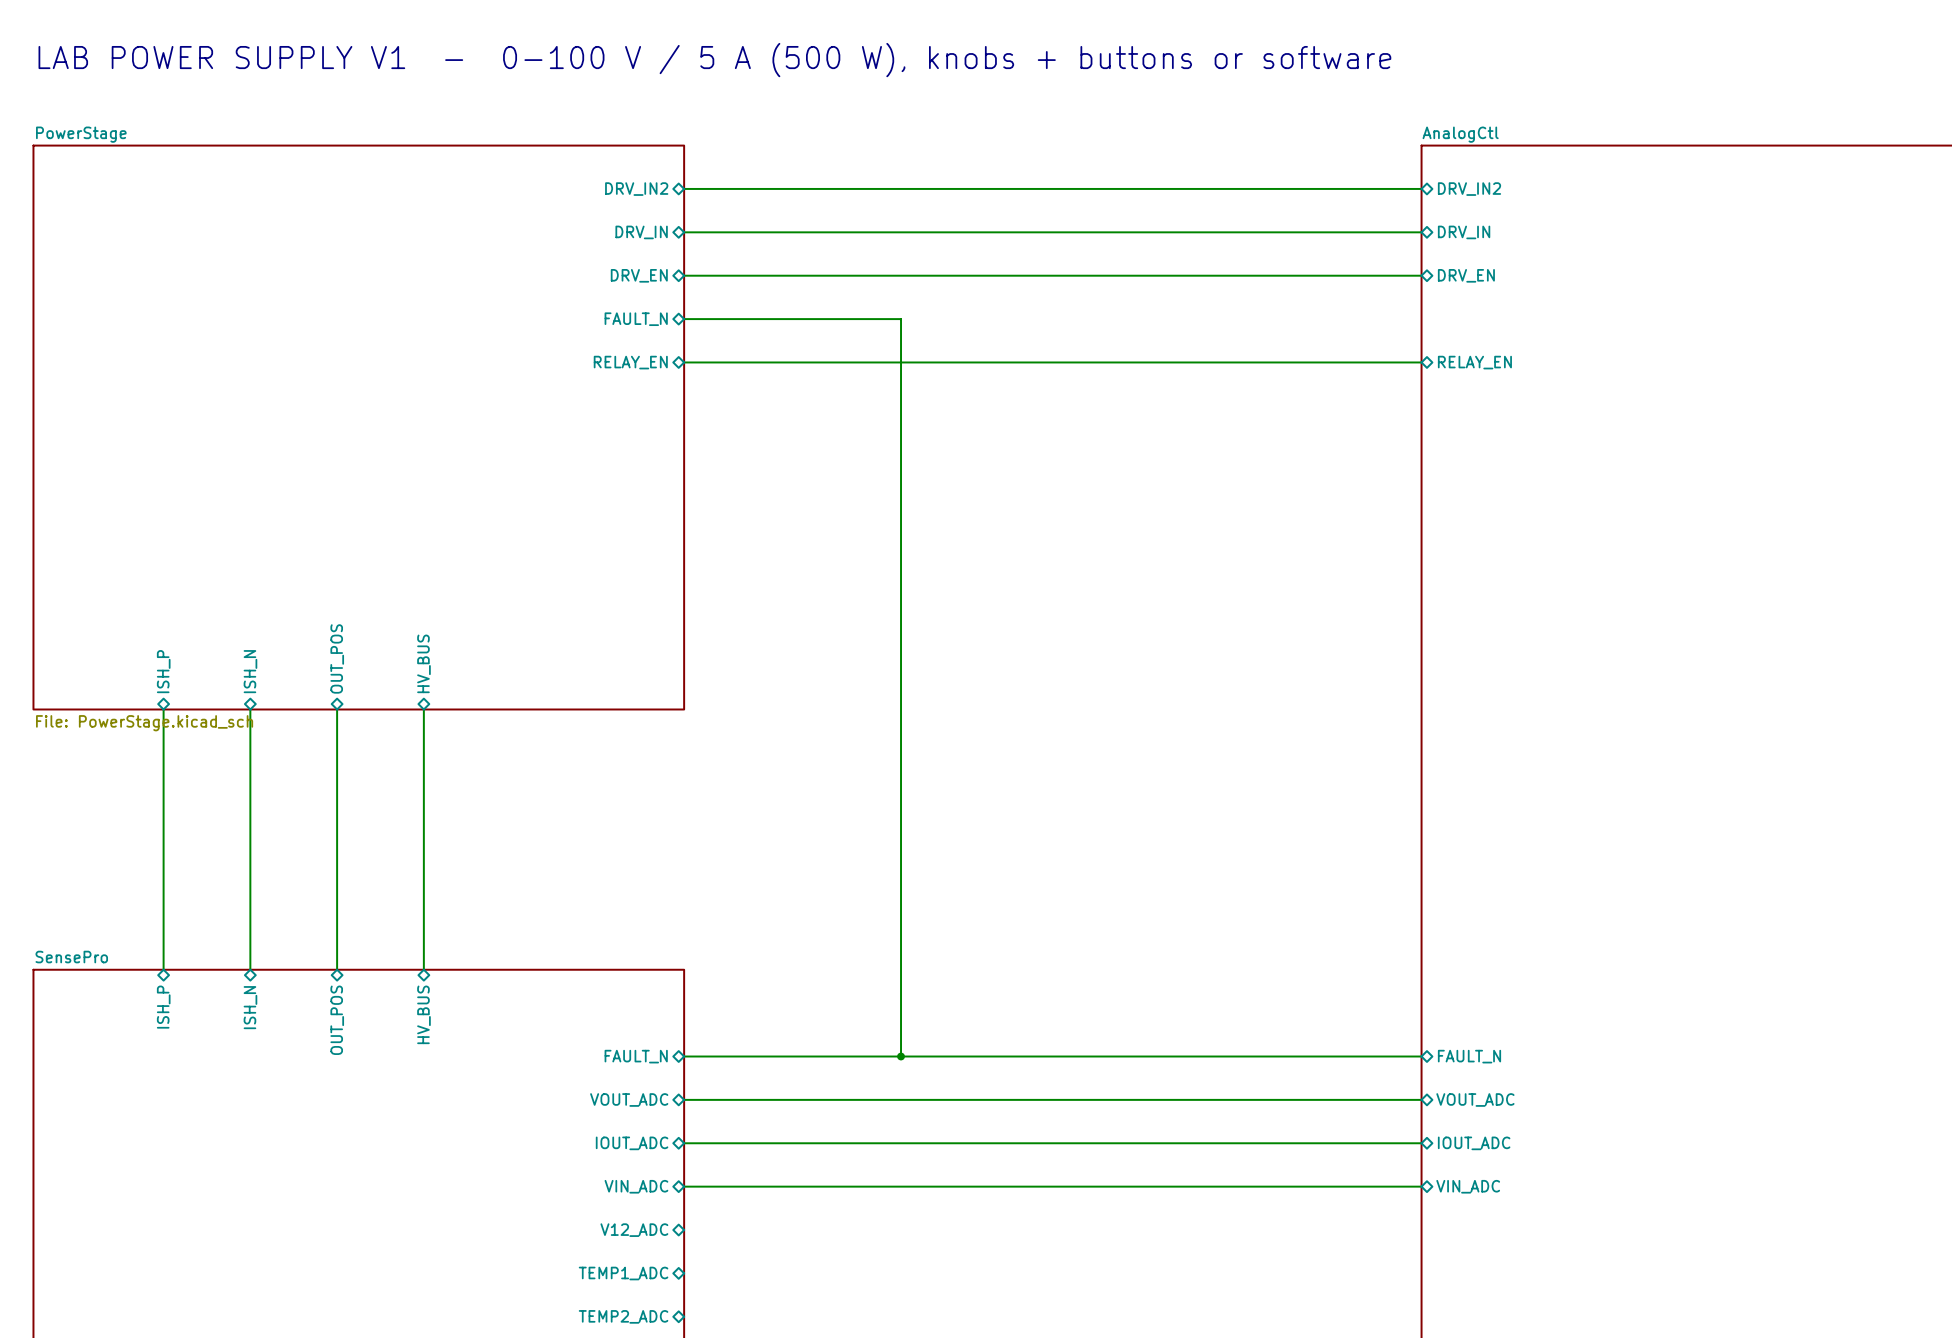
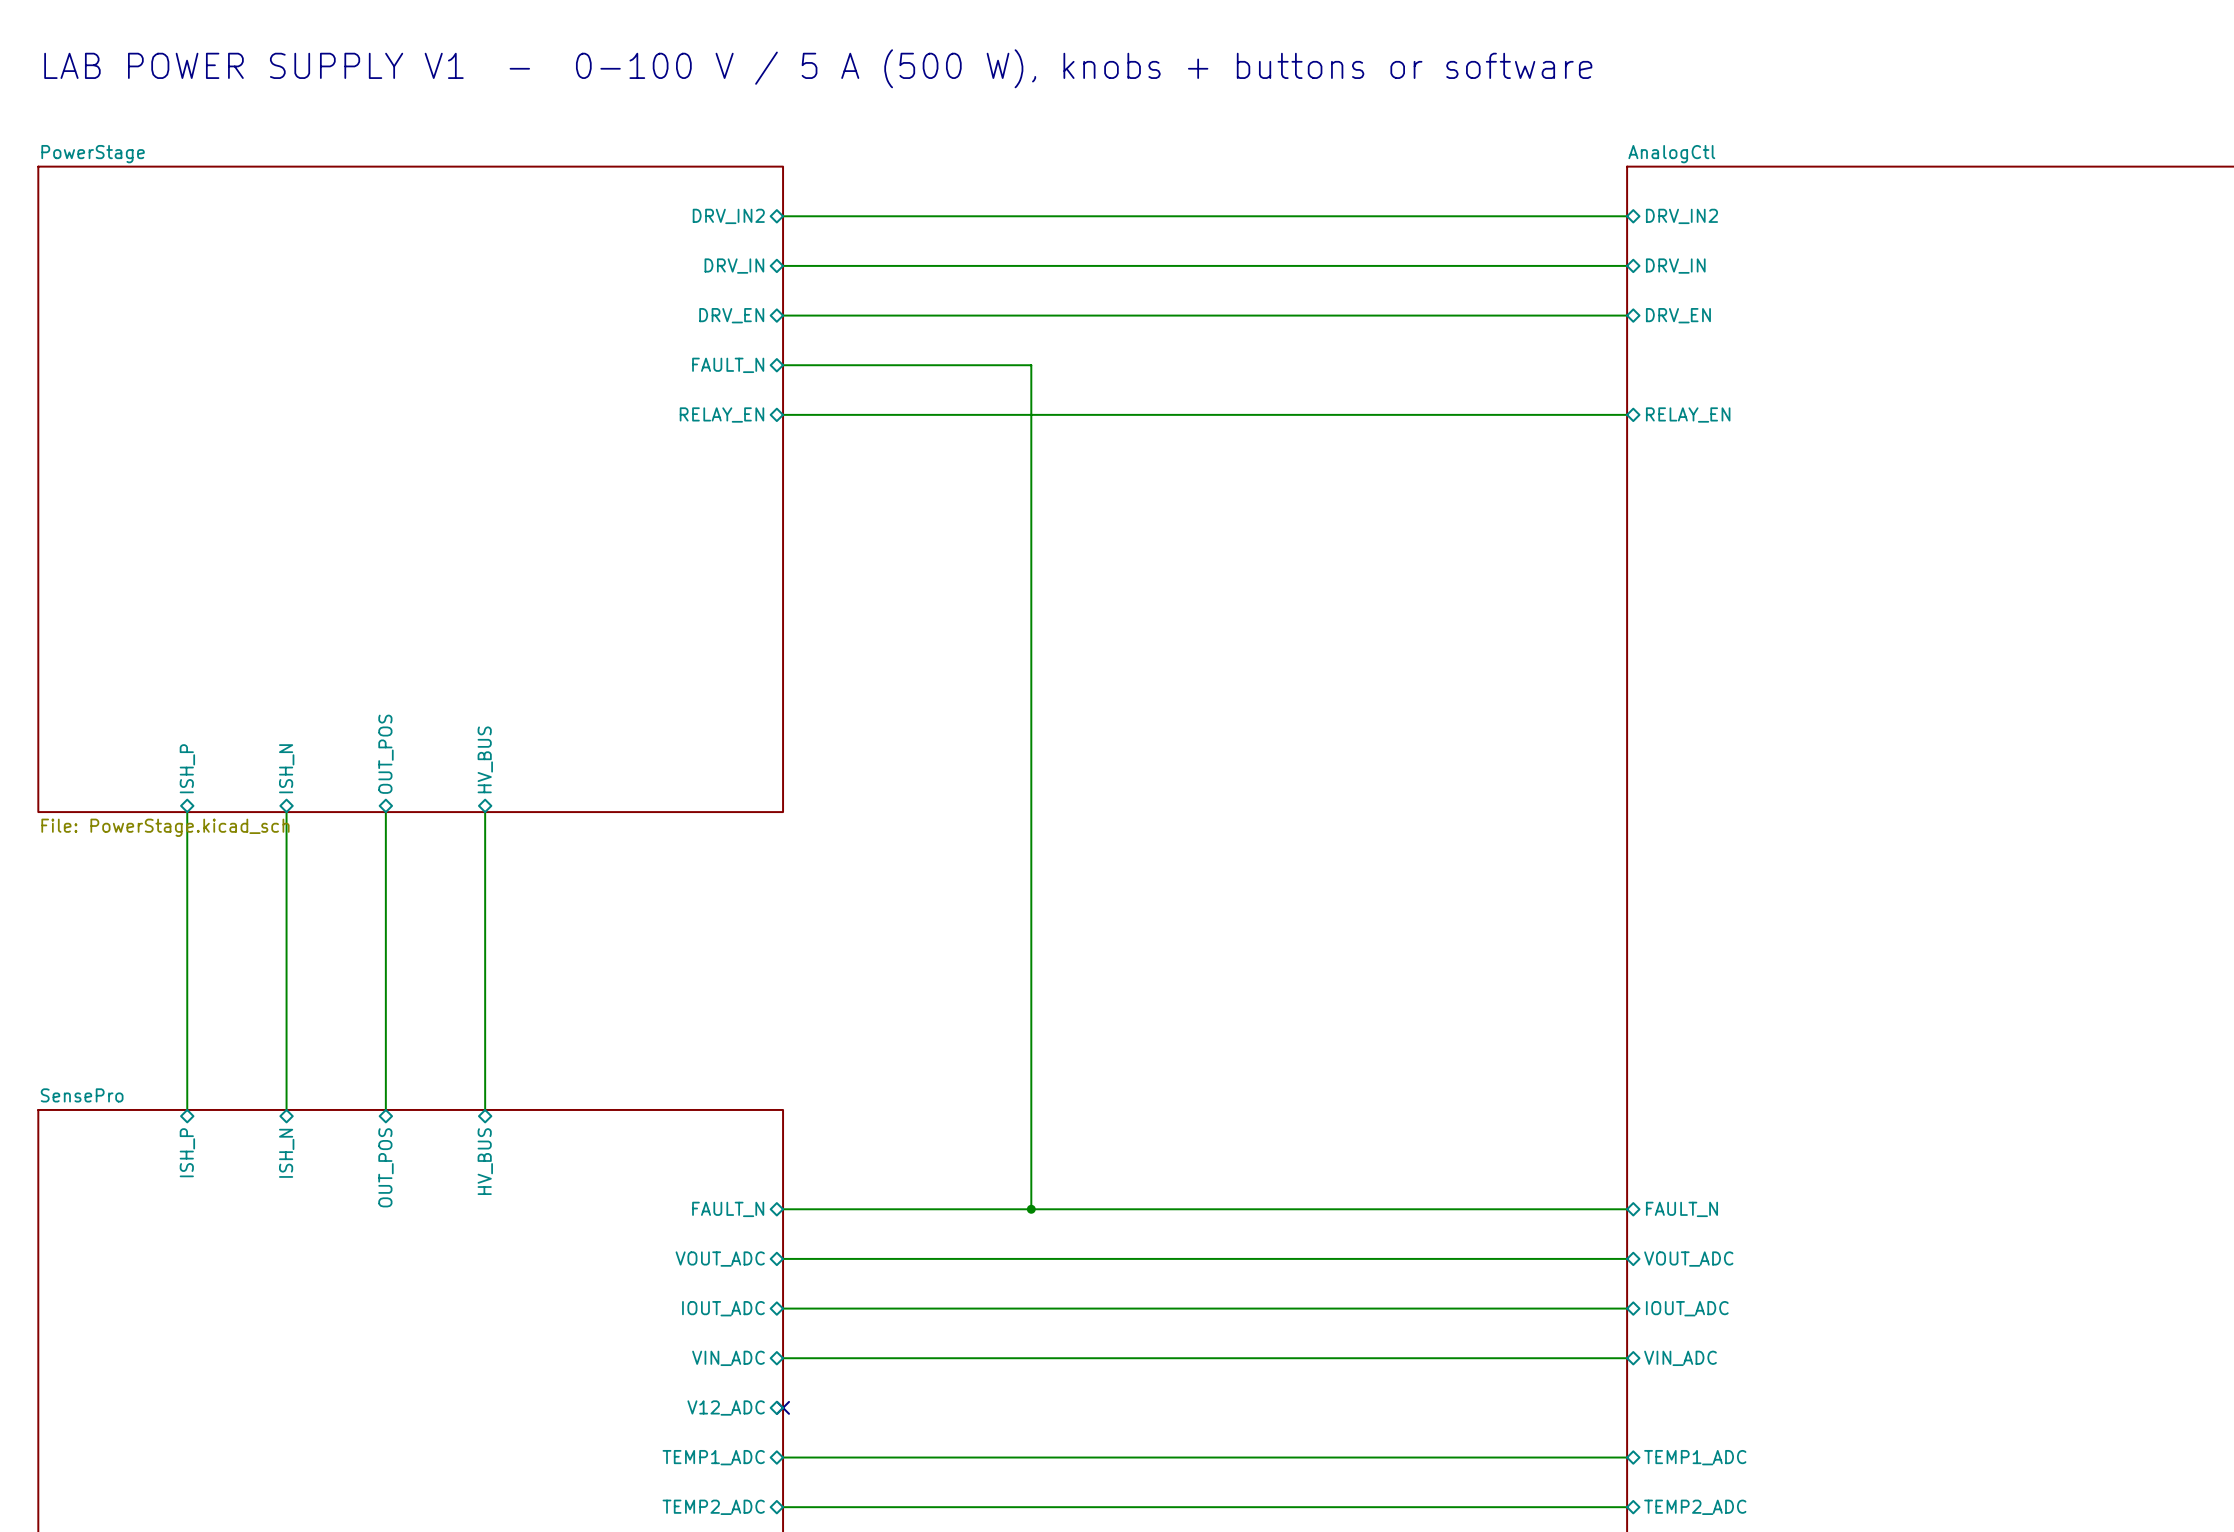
no-connect mark: none -> (783, 1407)
wire: none -> (783, 1457) (1627, 1457)
sheet pin: none -> TEMP1_ADC (1695, 1457)
wire: none -> (783, 1507) (1627, 1507)
sheet pin: none -> TEMP2_ADC (1695, 1507)

